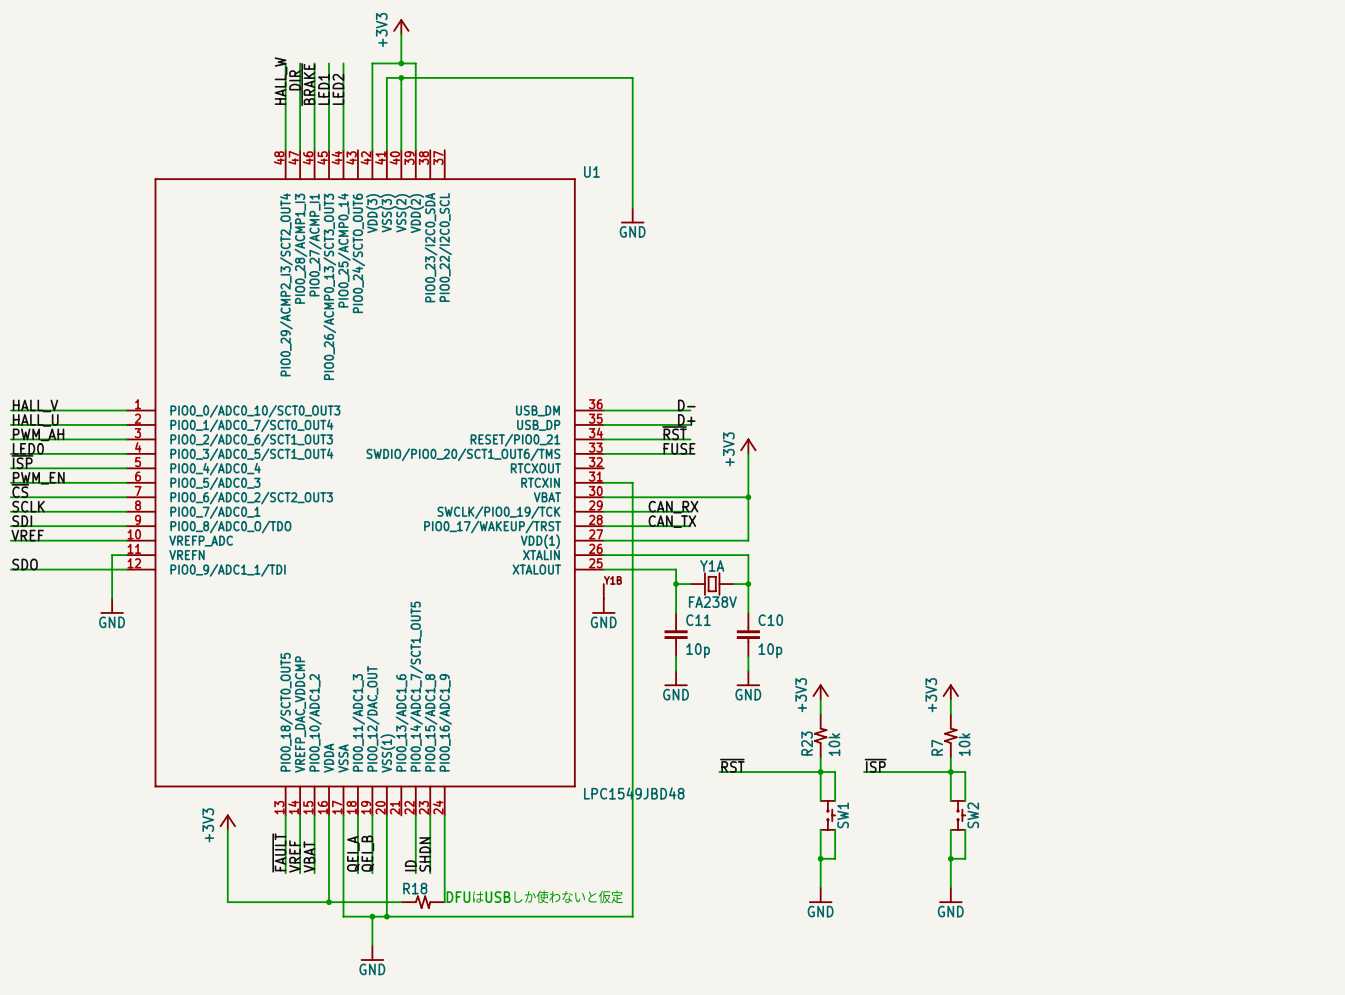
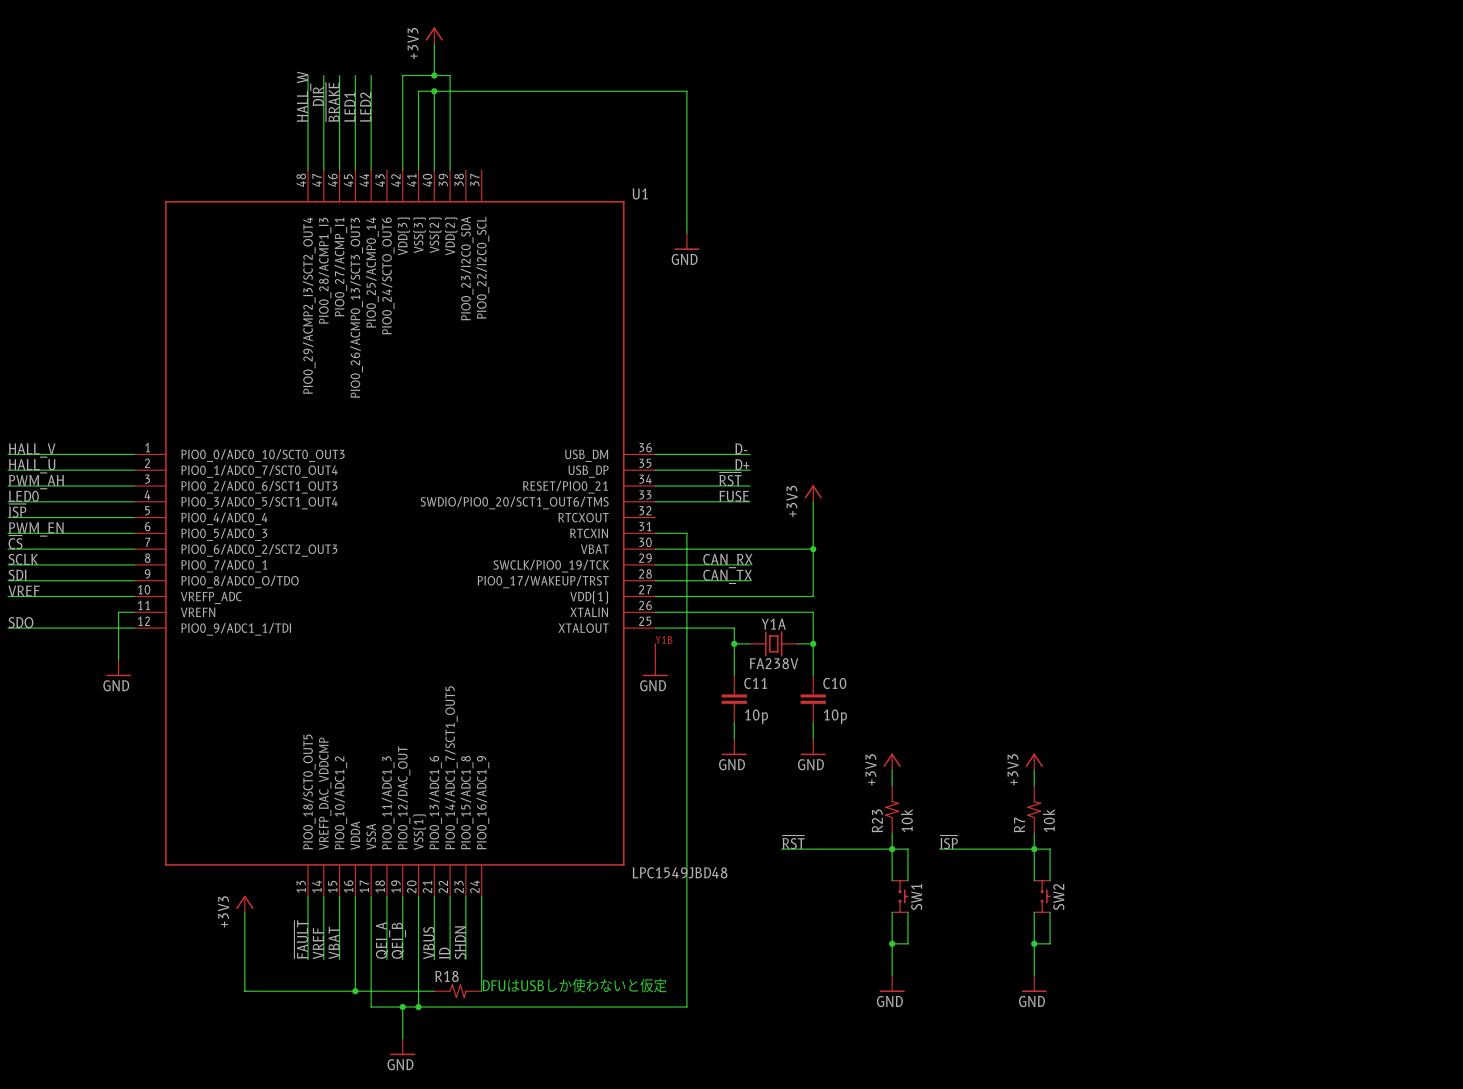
wire: none -> (434, 896) (434, 959)
label: none -> VBUS (428, 943)

